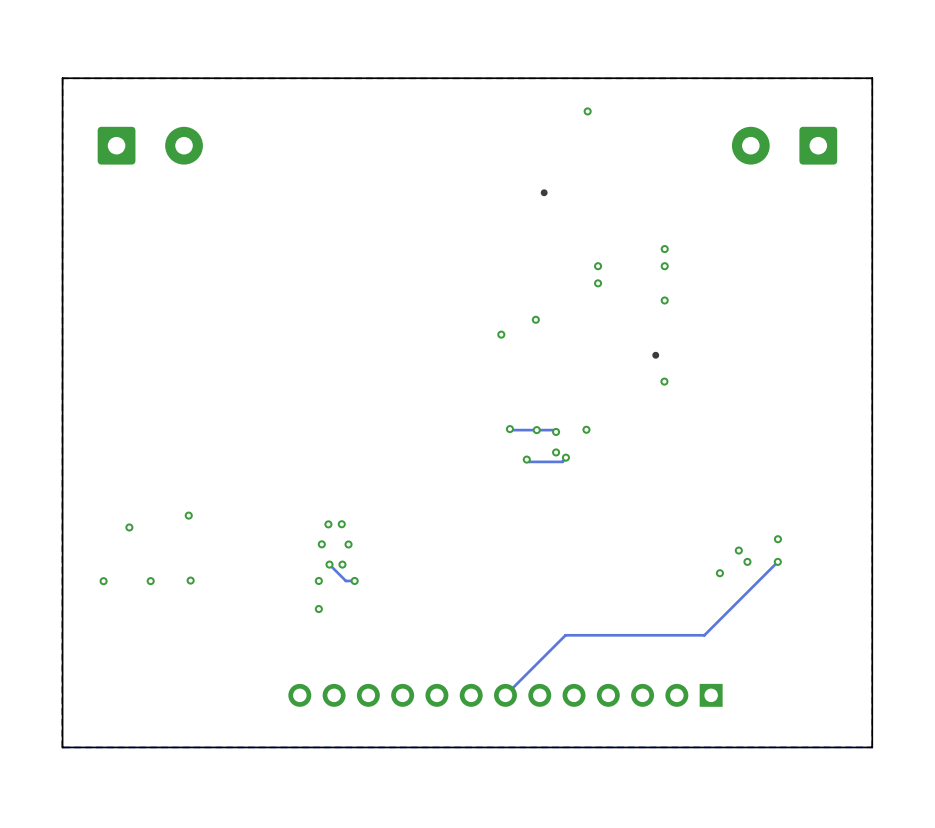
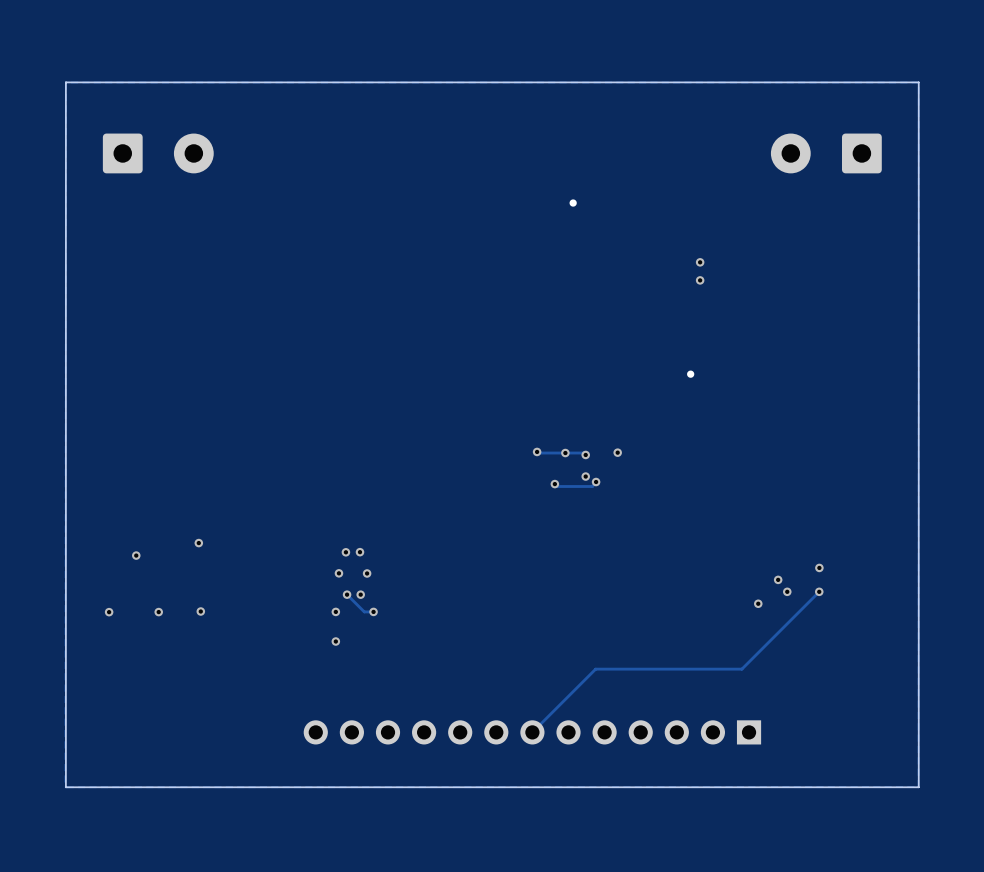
via: (587, 111) -> none
via: (598, 266) -> none
via: (598, 283) -> none
via: (664, 300) -> none
via: (535, 319) -> none
via: (501, 334) -> none
via: (664, 381) -> none

